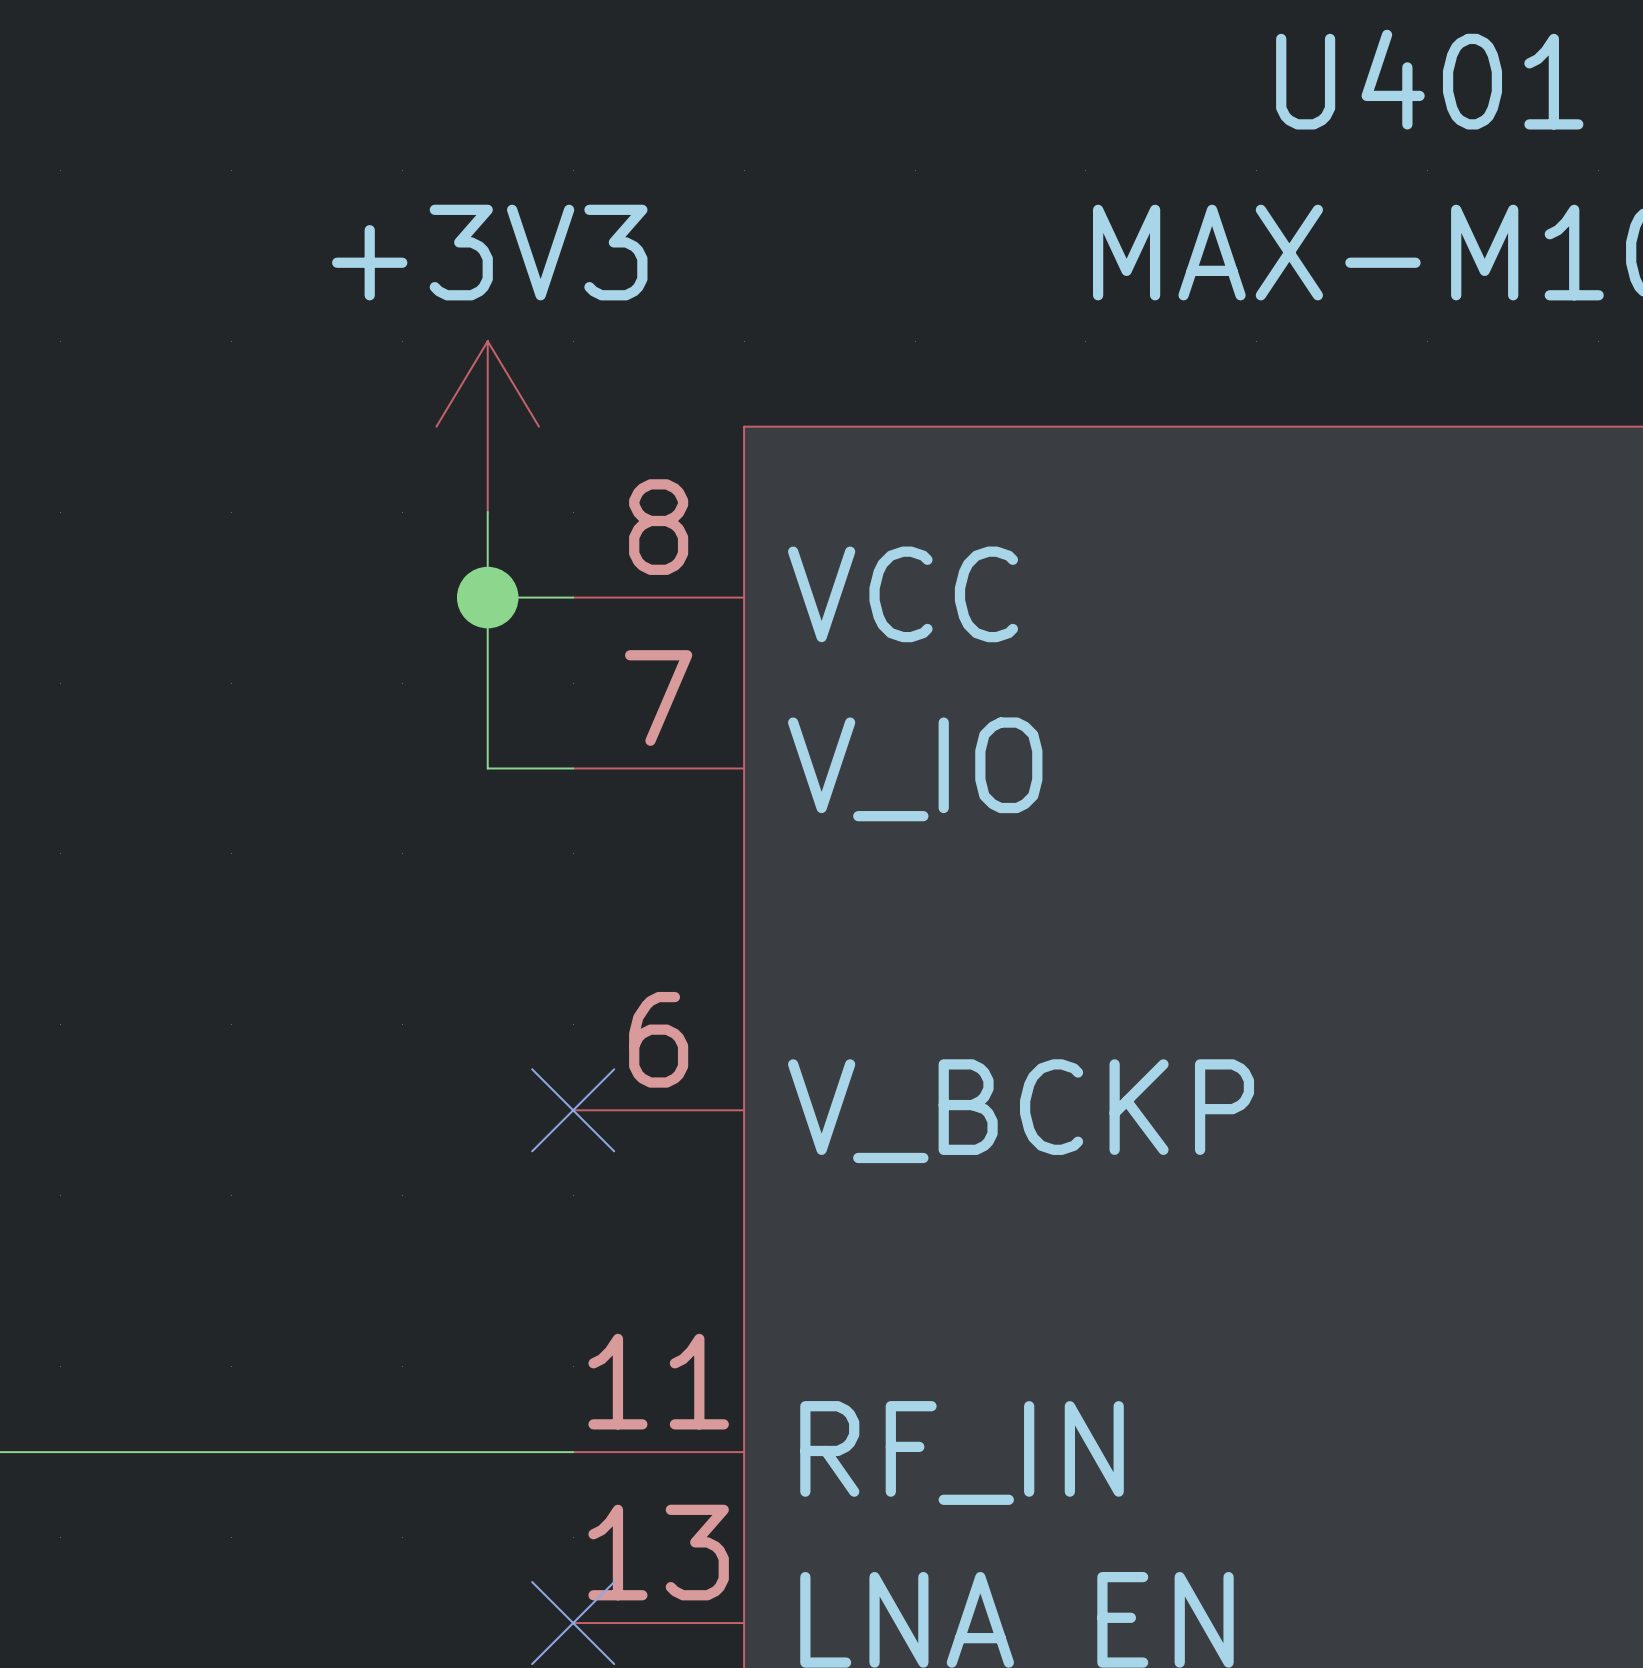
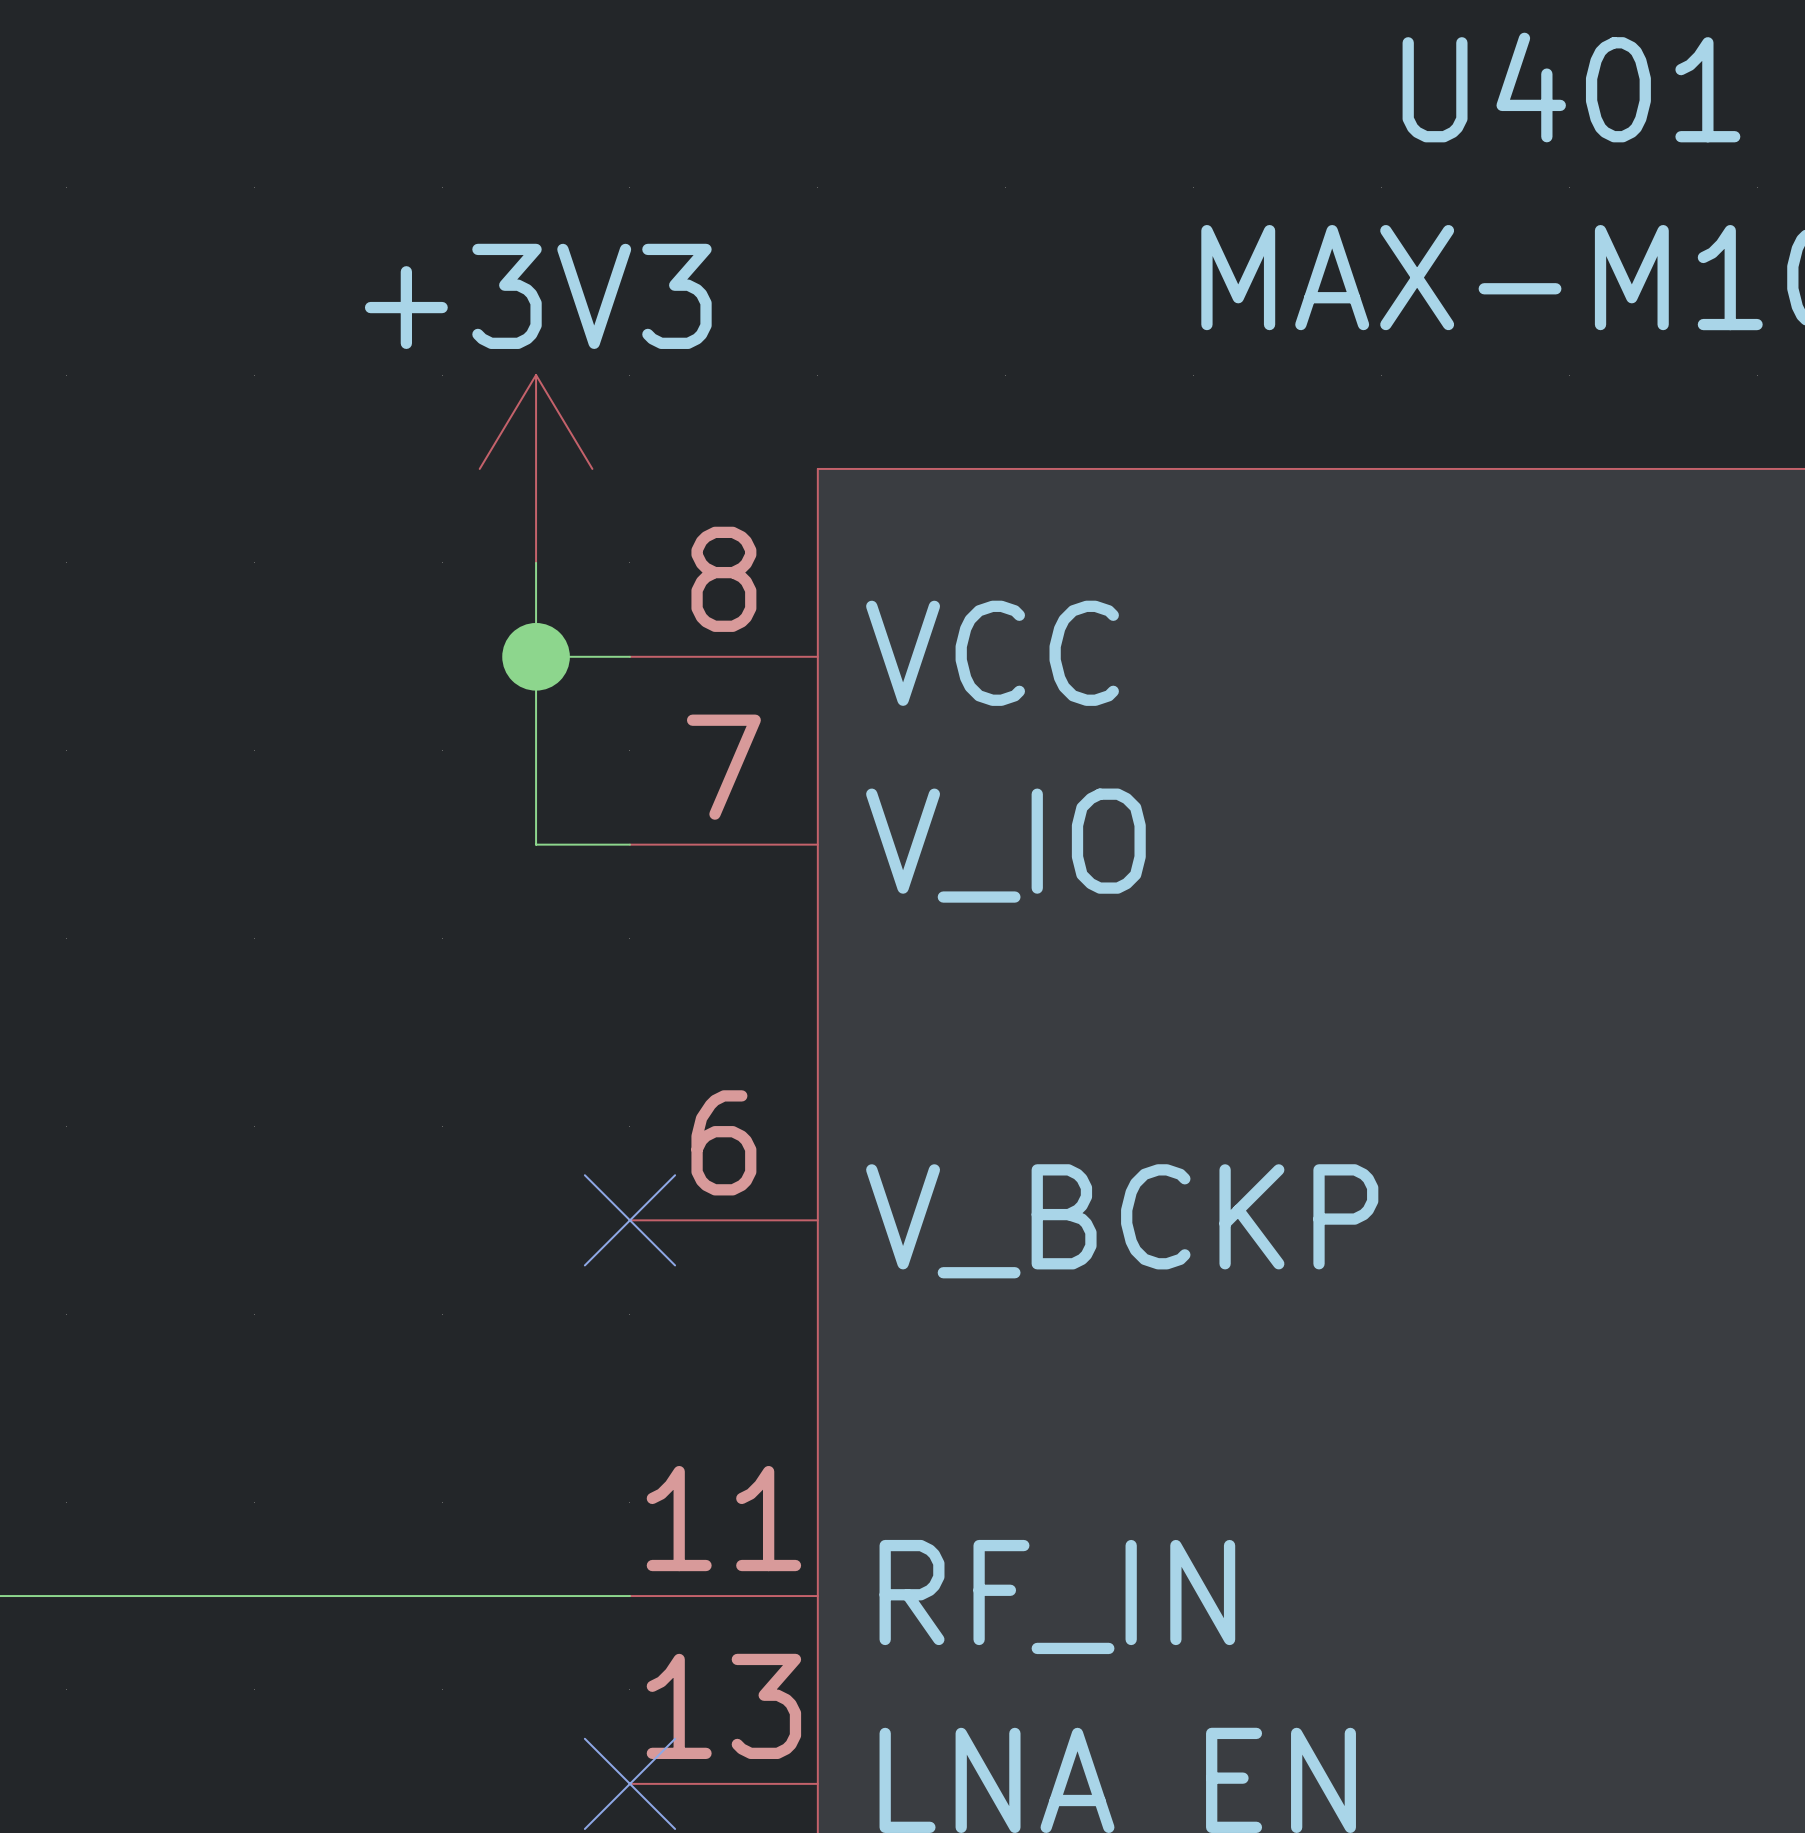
power symbol text position: +3V3 (489, 252) -> +3V3 (538, 296)

